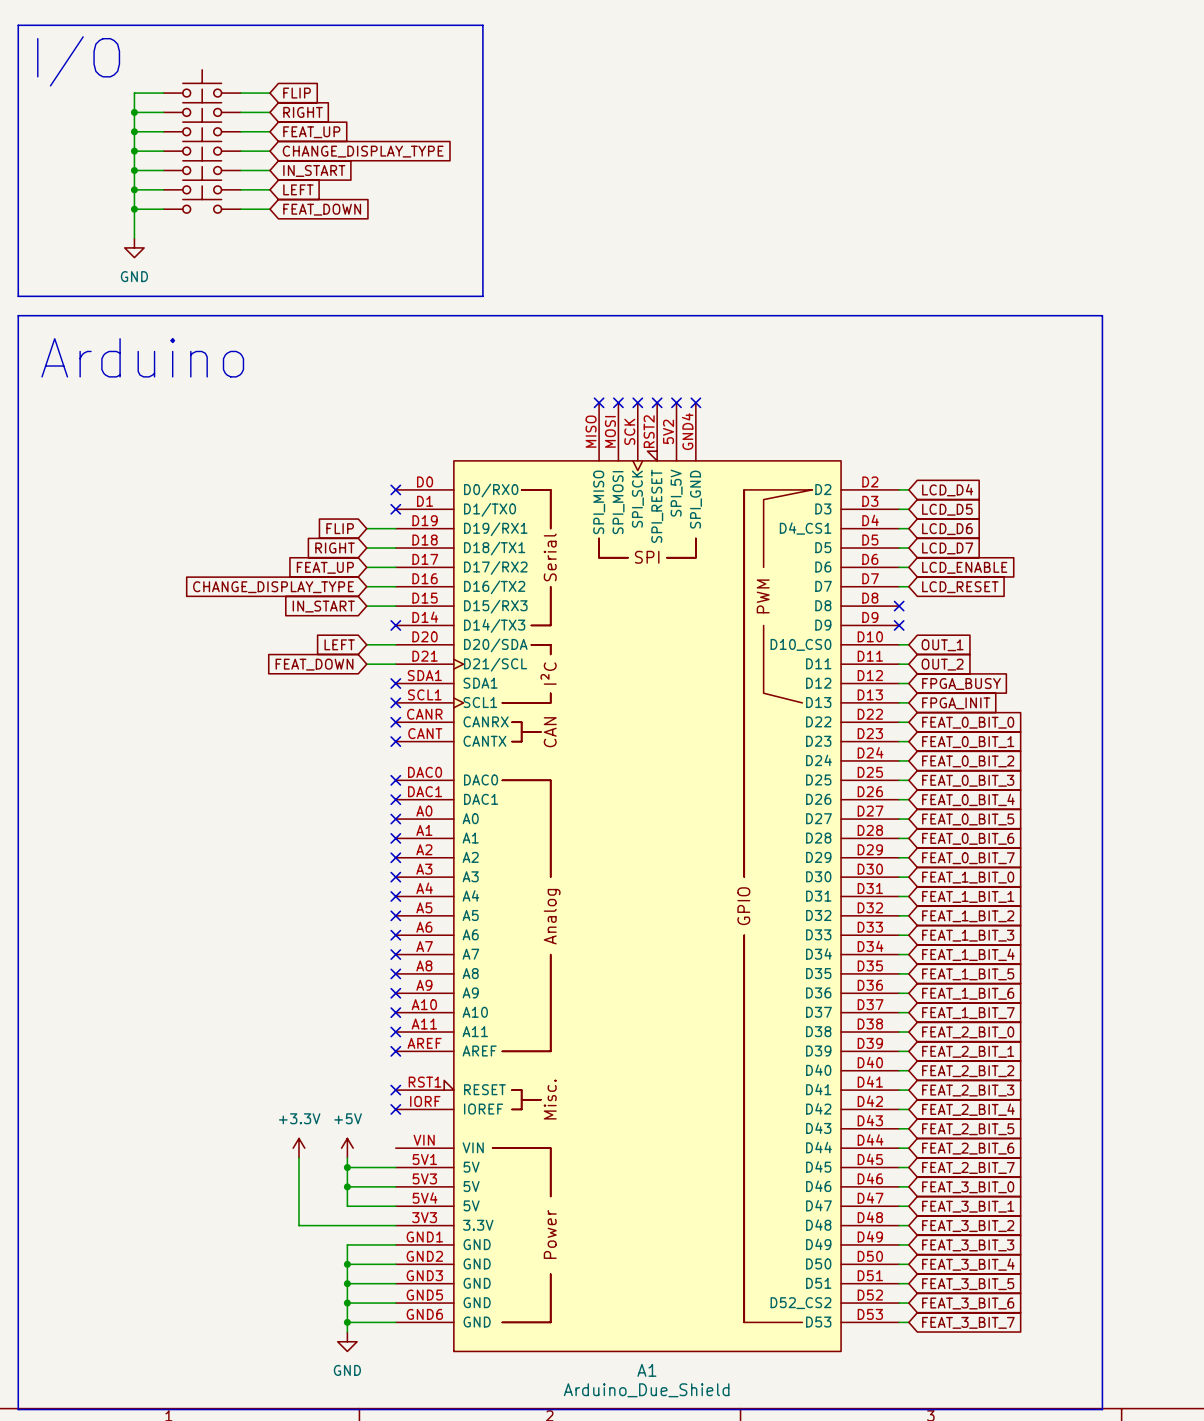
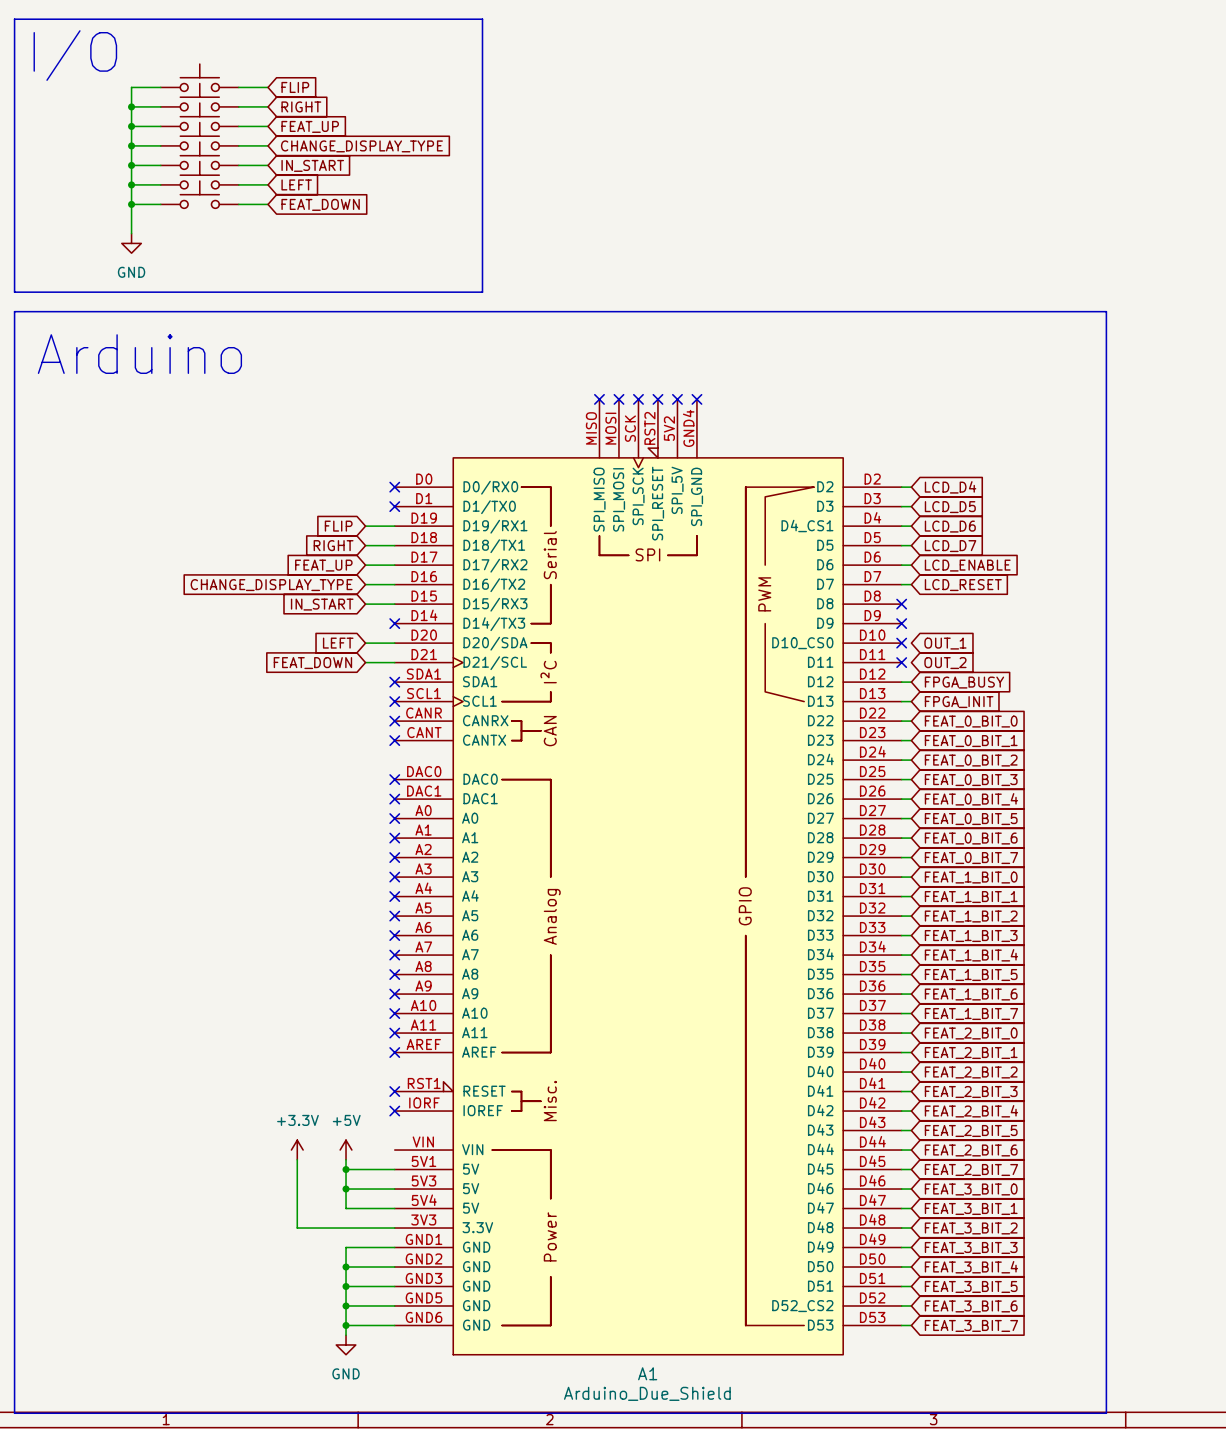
wire: (899, 644) (908, 644) -> none
no-connect mark: none -> (901, 643)
wire: (899, 664) (908, 664) -> none
no-connect mark: none -> (901, 662)

